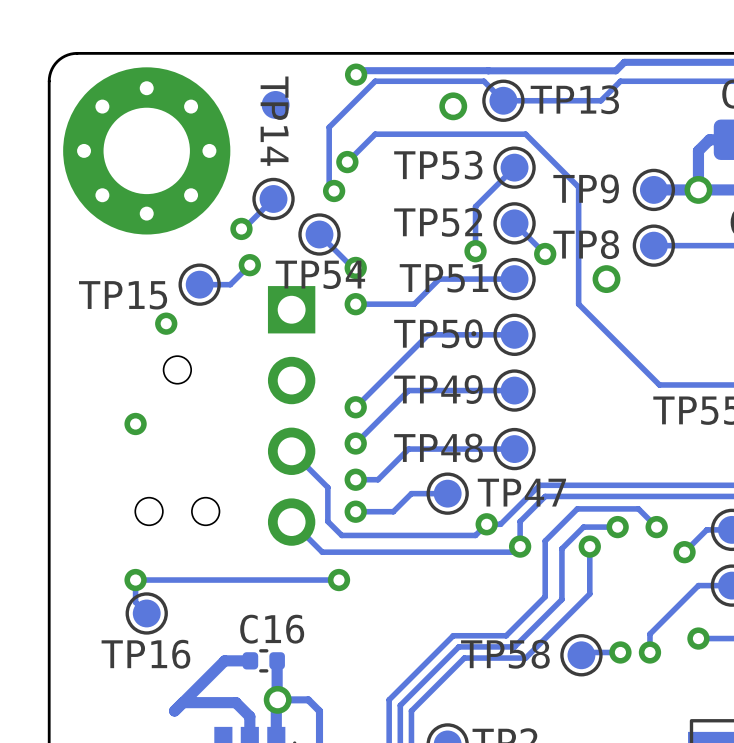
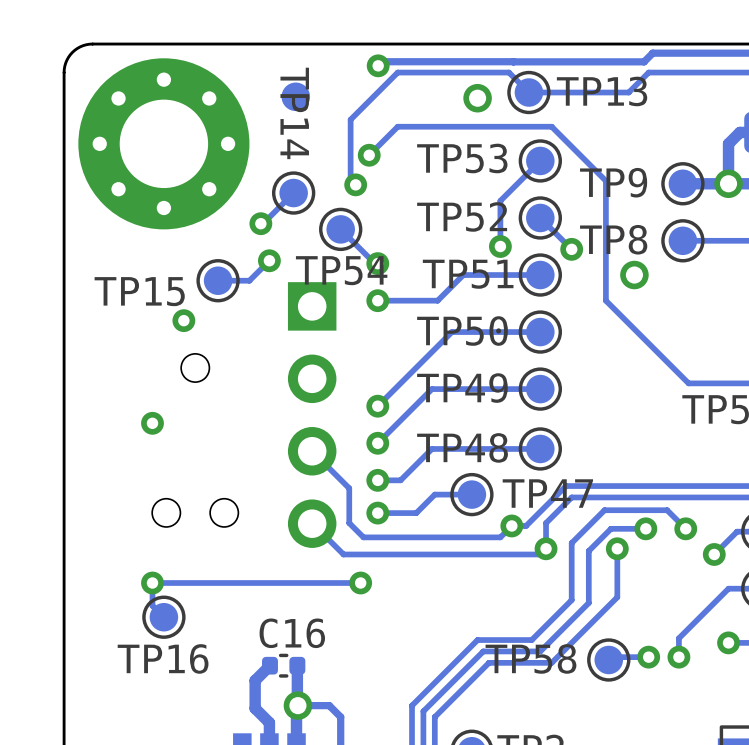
track: (250, 660) (224, 660) (174, 711) -> (269, 665) (255, 680) (255, 708)
track: (235, 702) (182, 702) -> none

